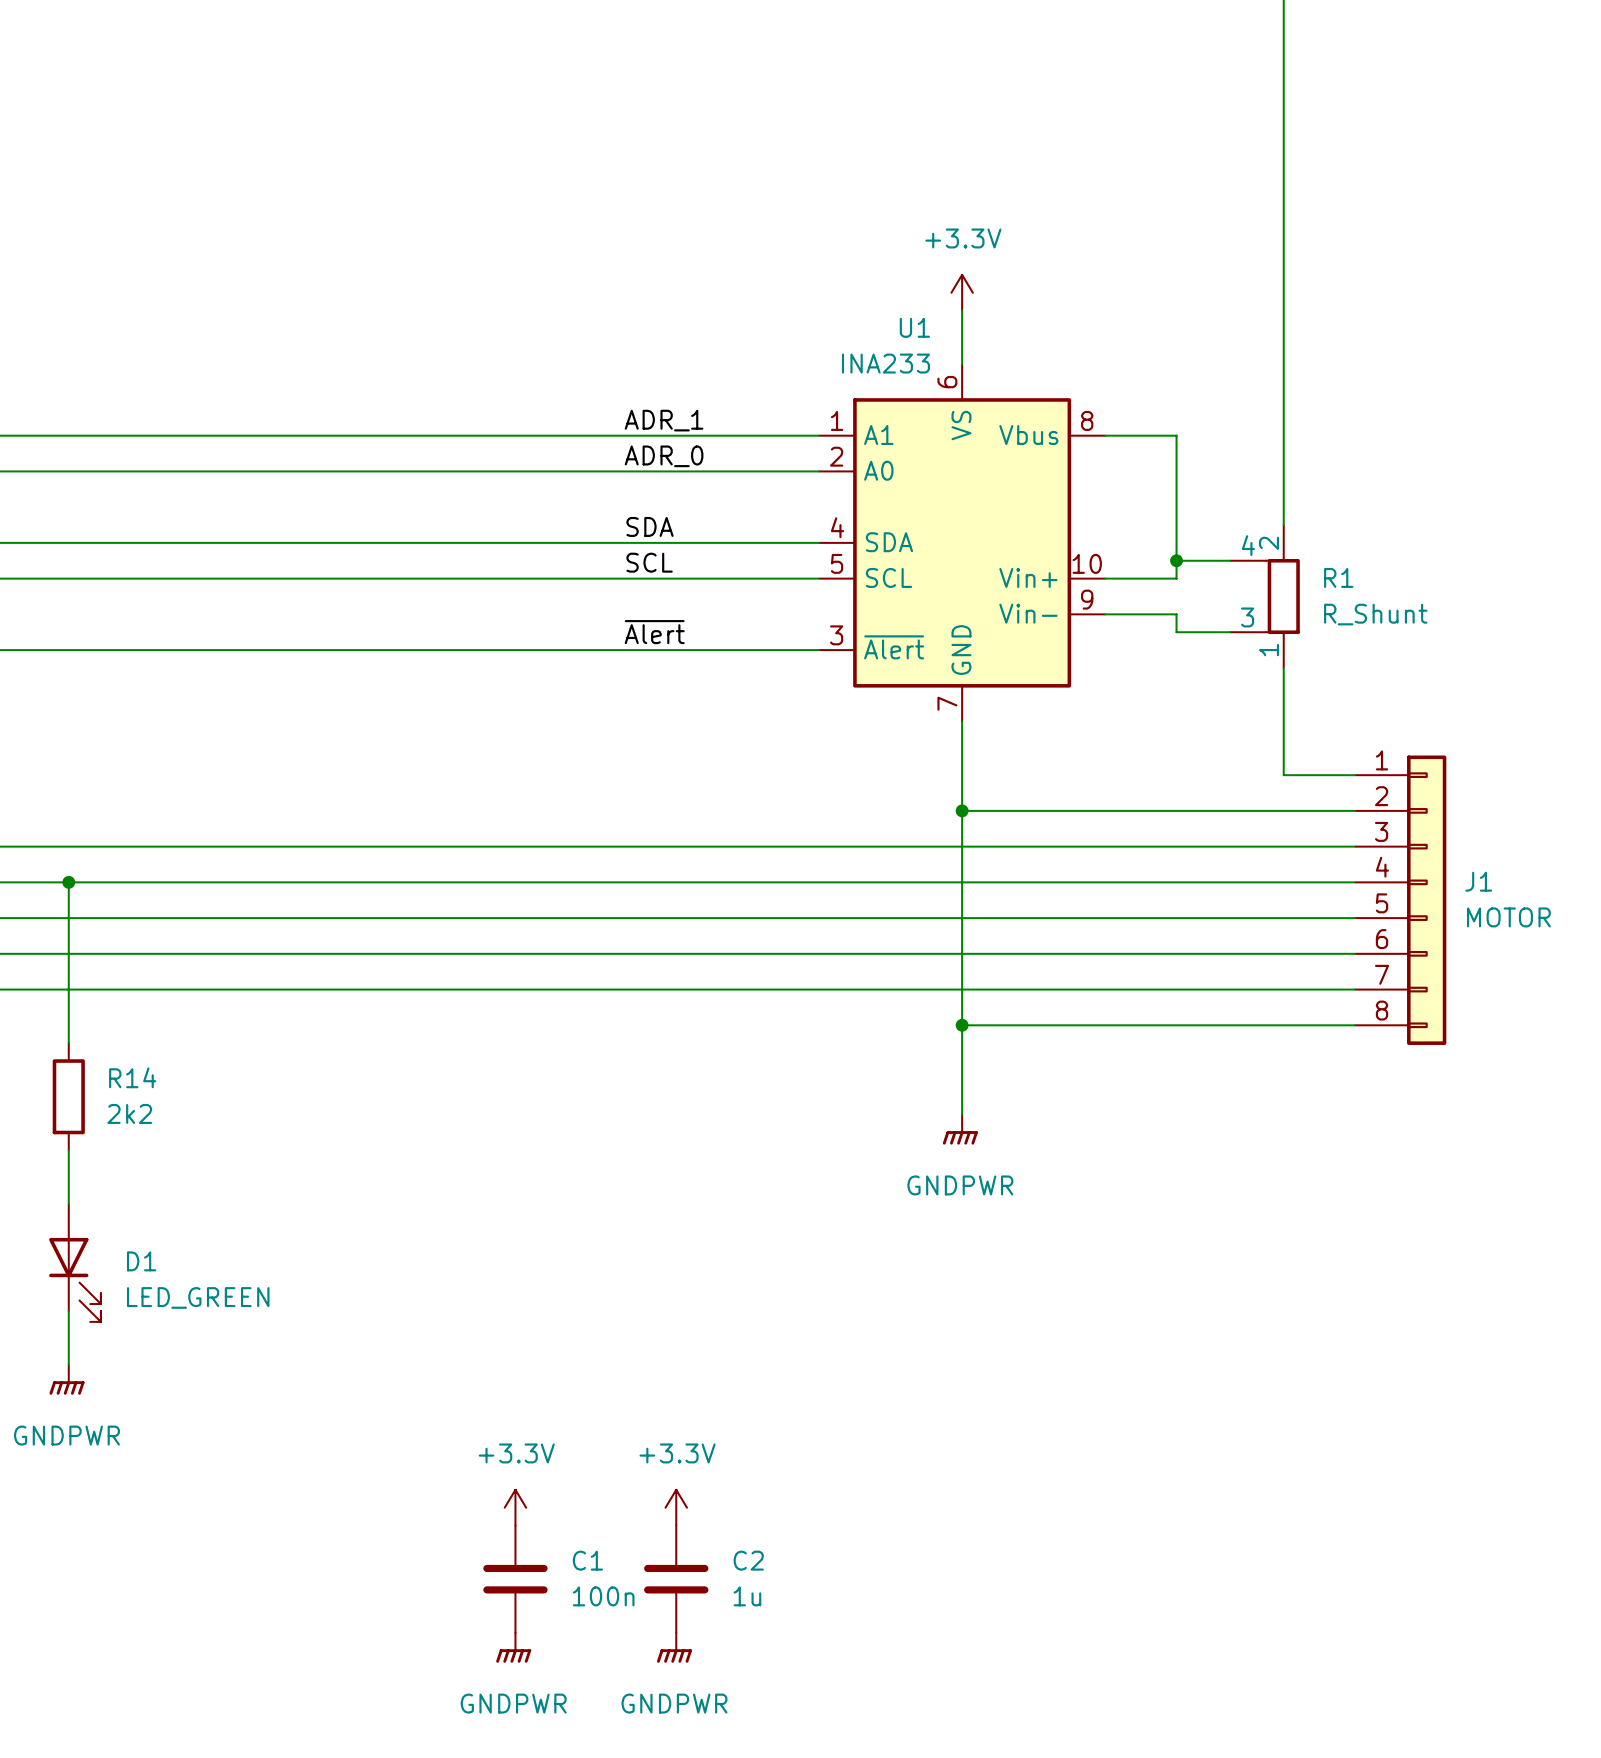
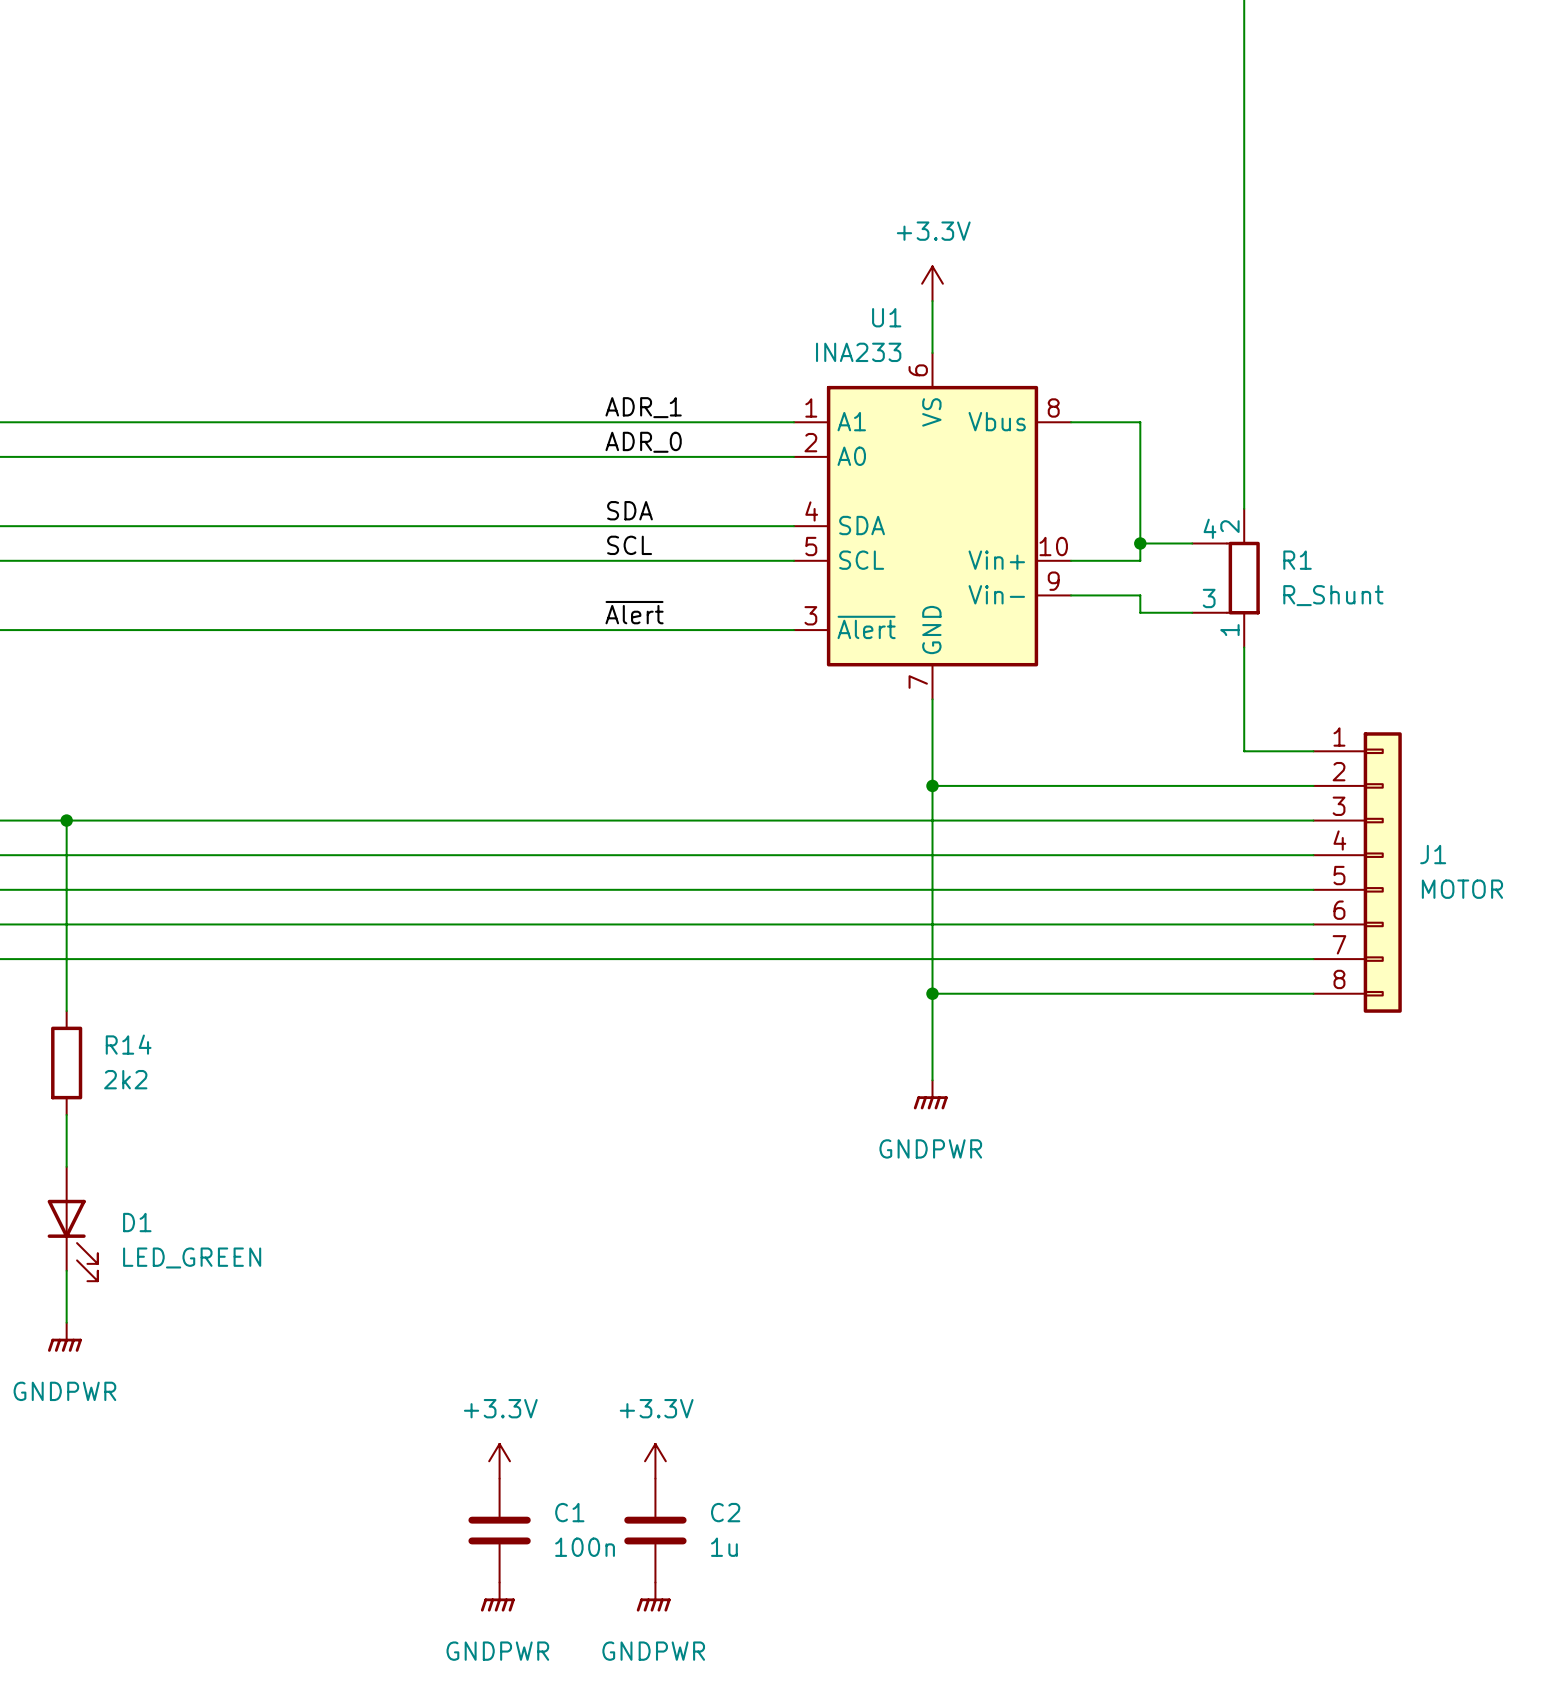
wire: none -> (66, 820) (66, 855)
junction position: (68, 882) -> (66, 820)

